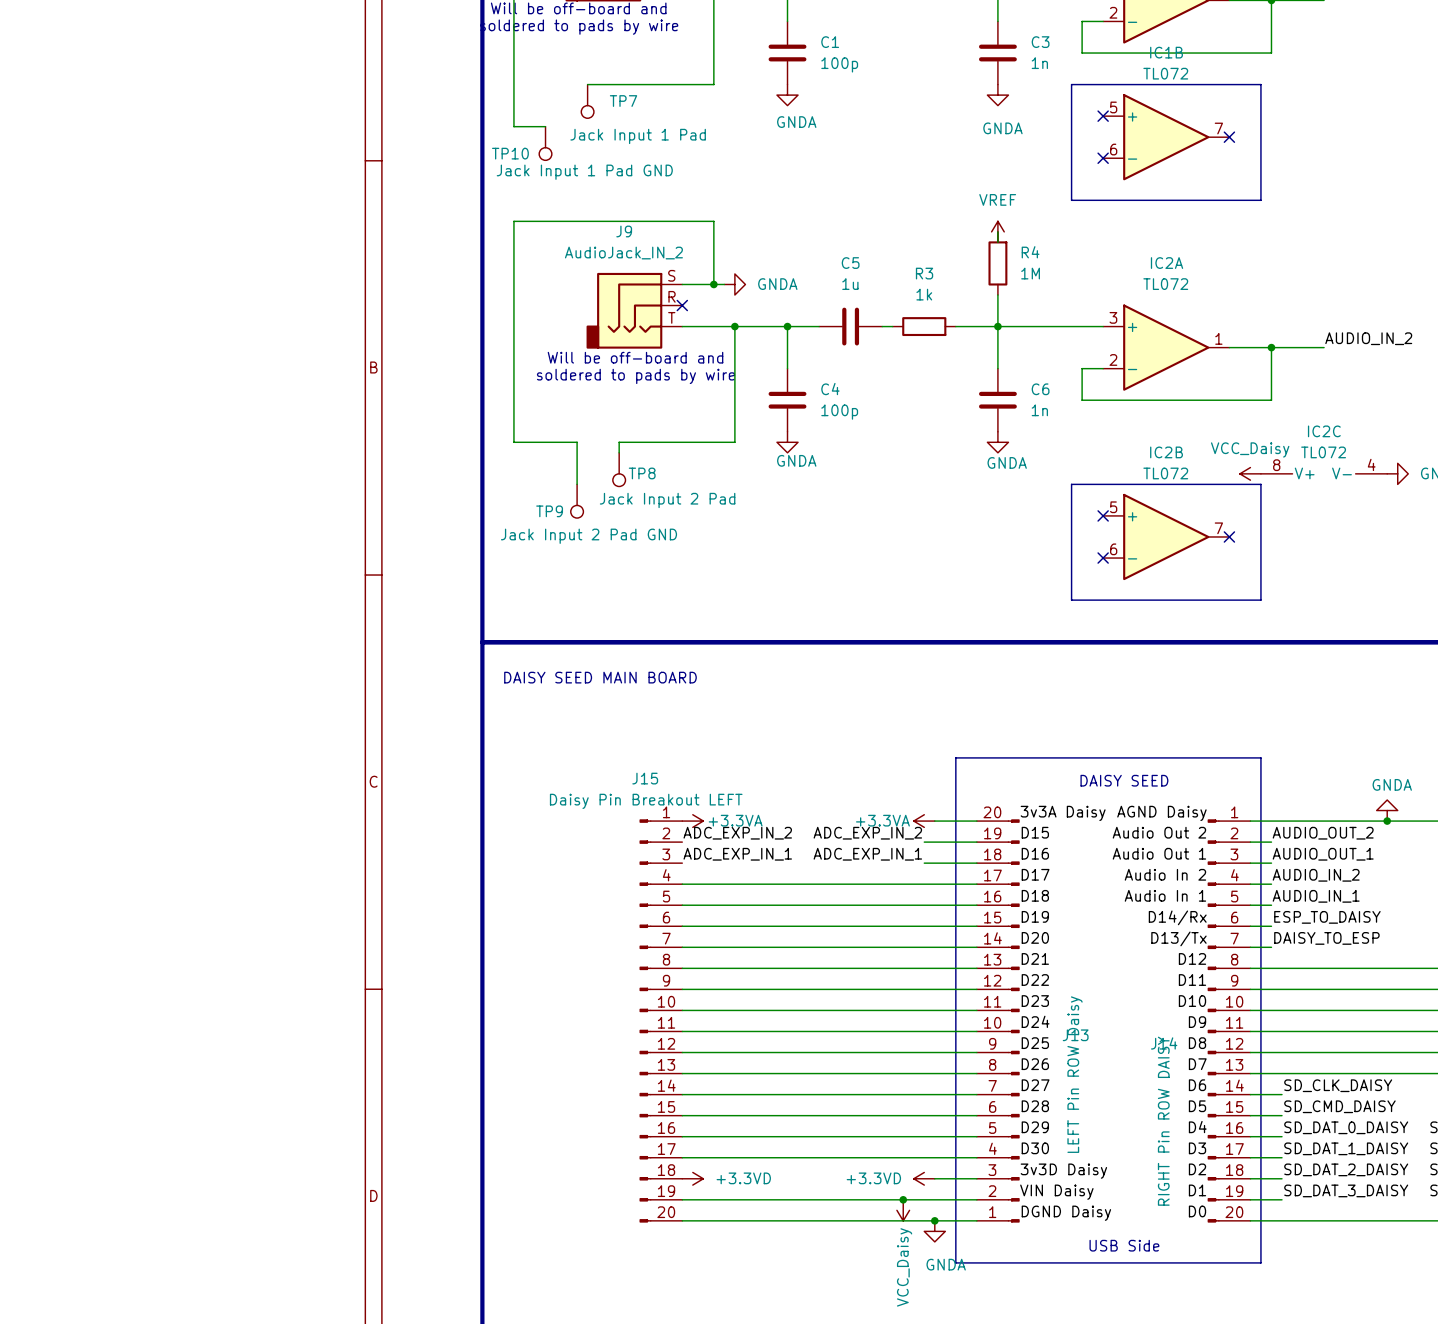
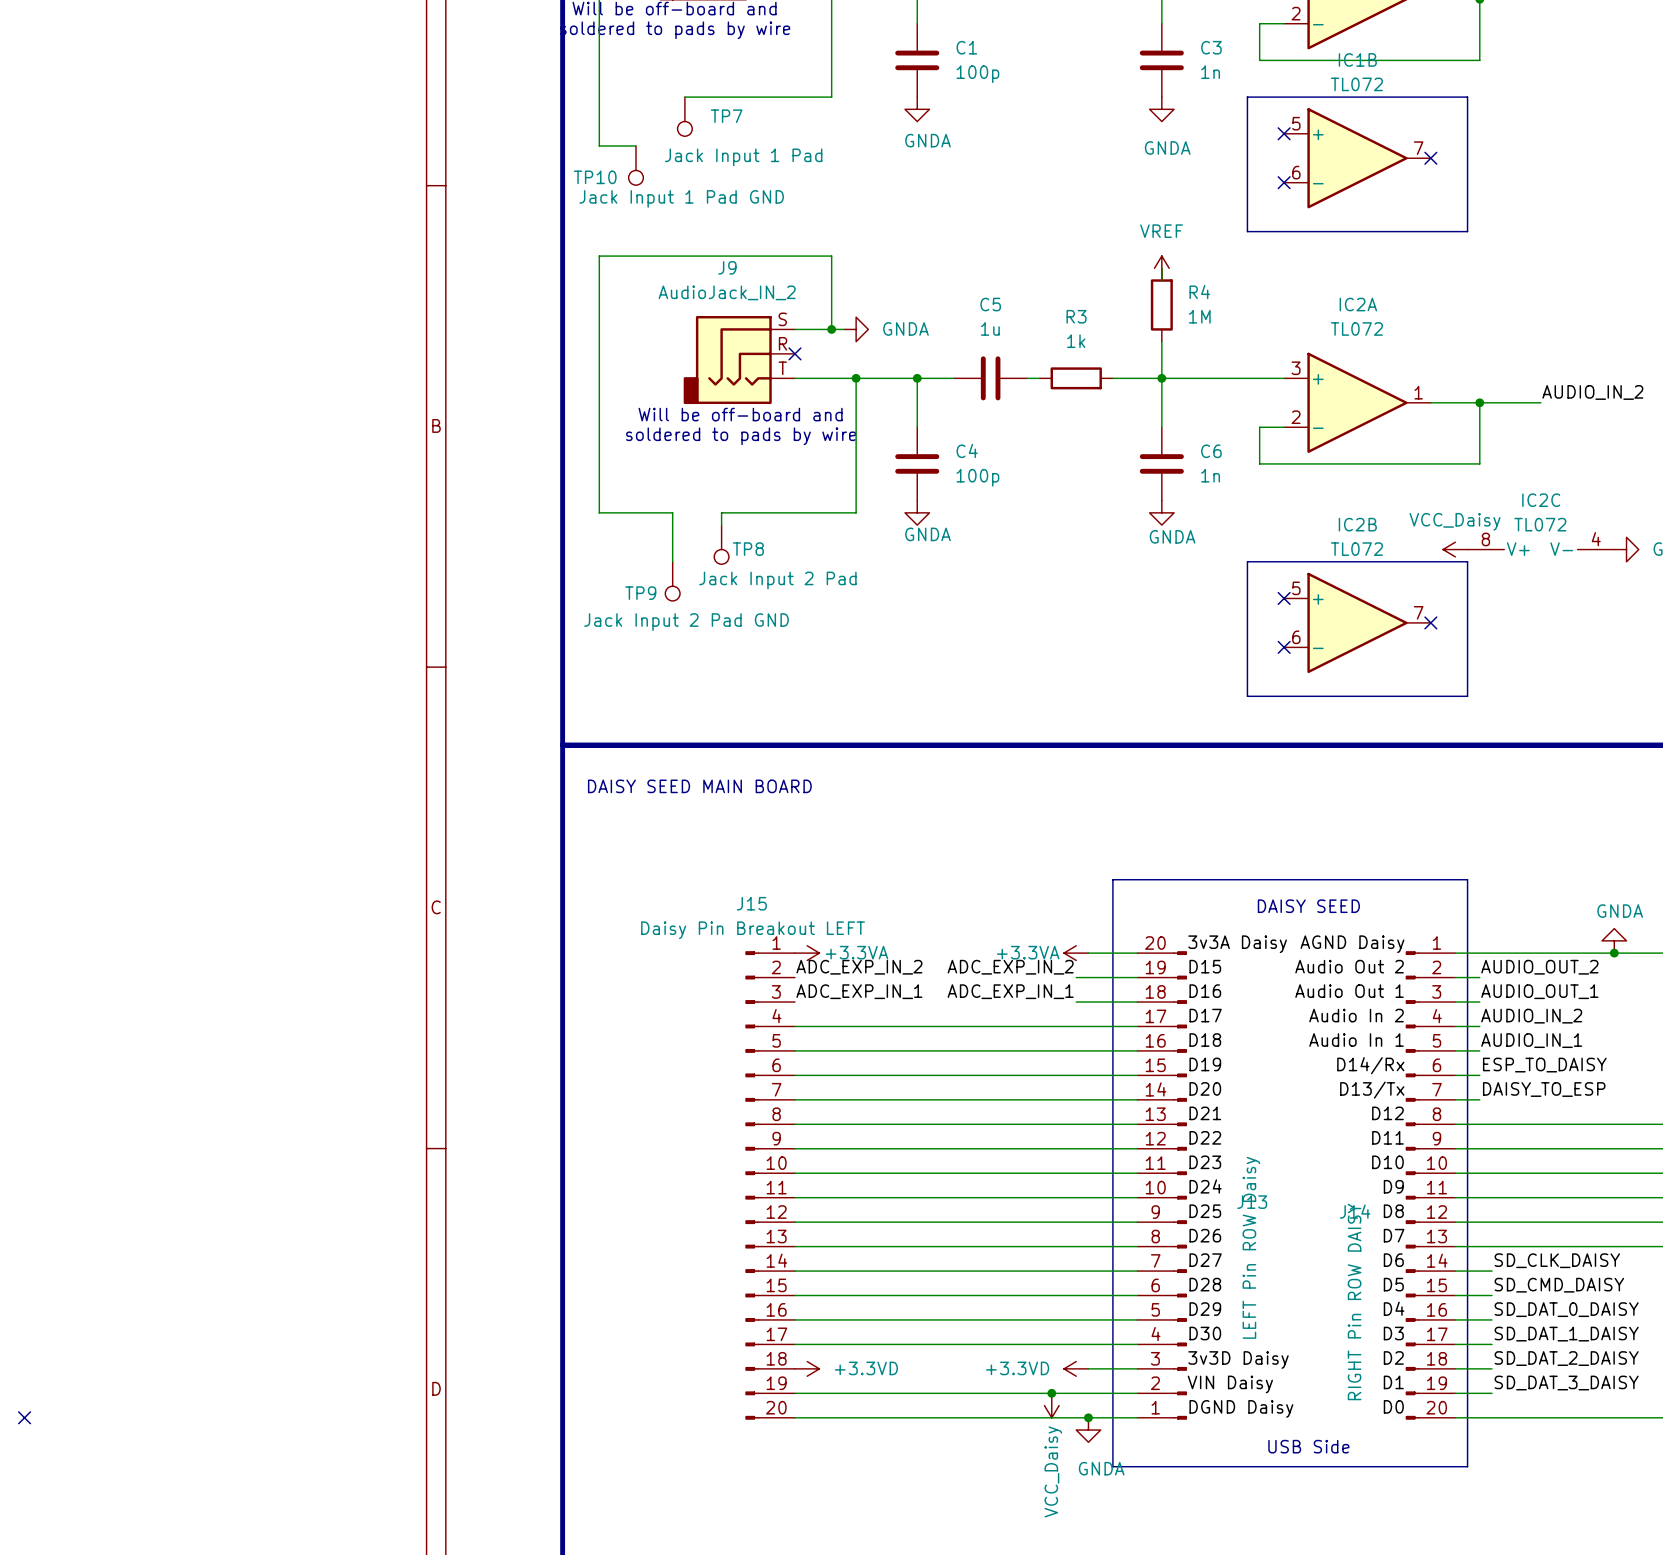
no-connect mark: none -> (24, 1417)

